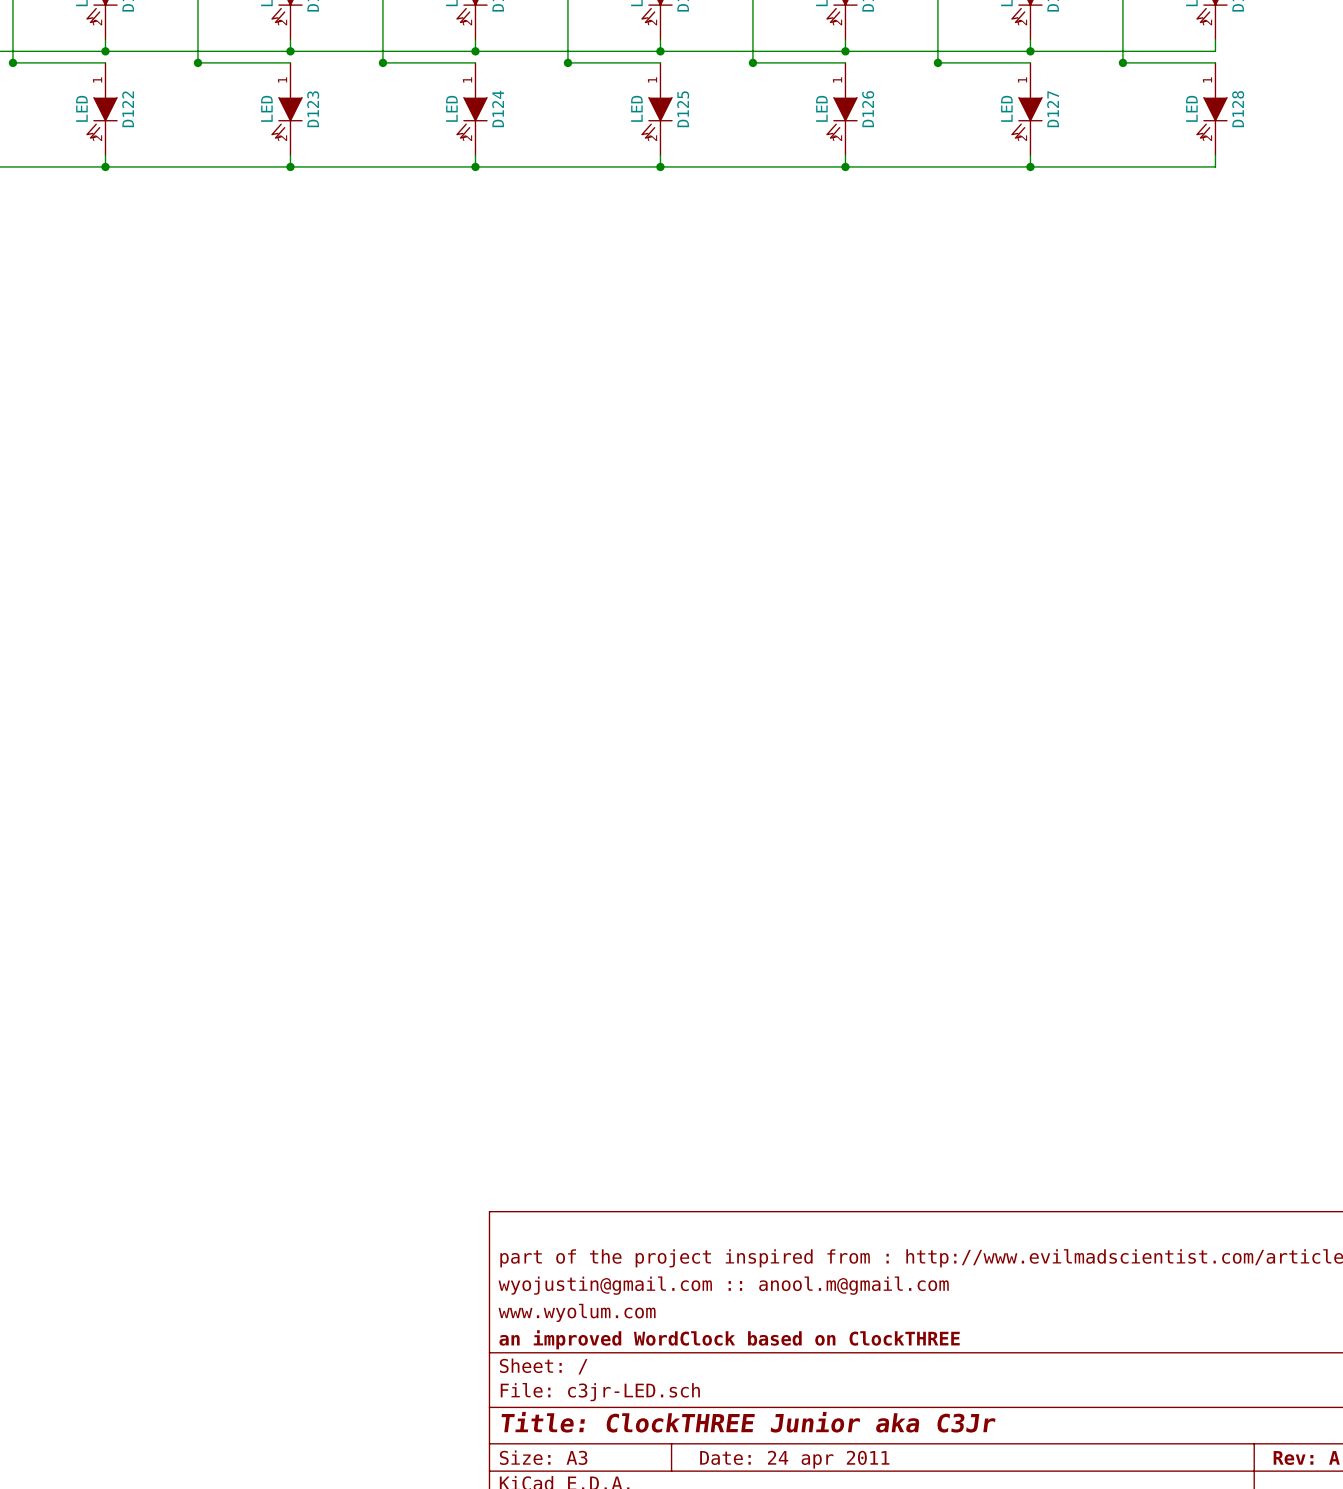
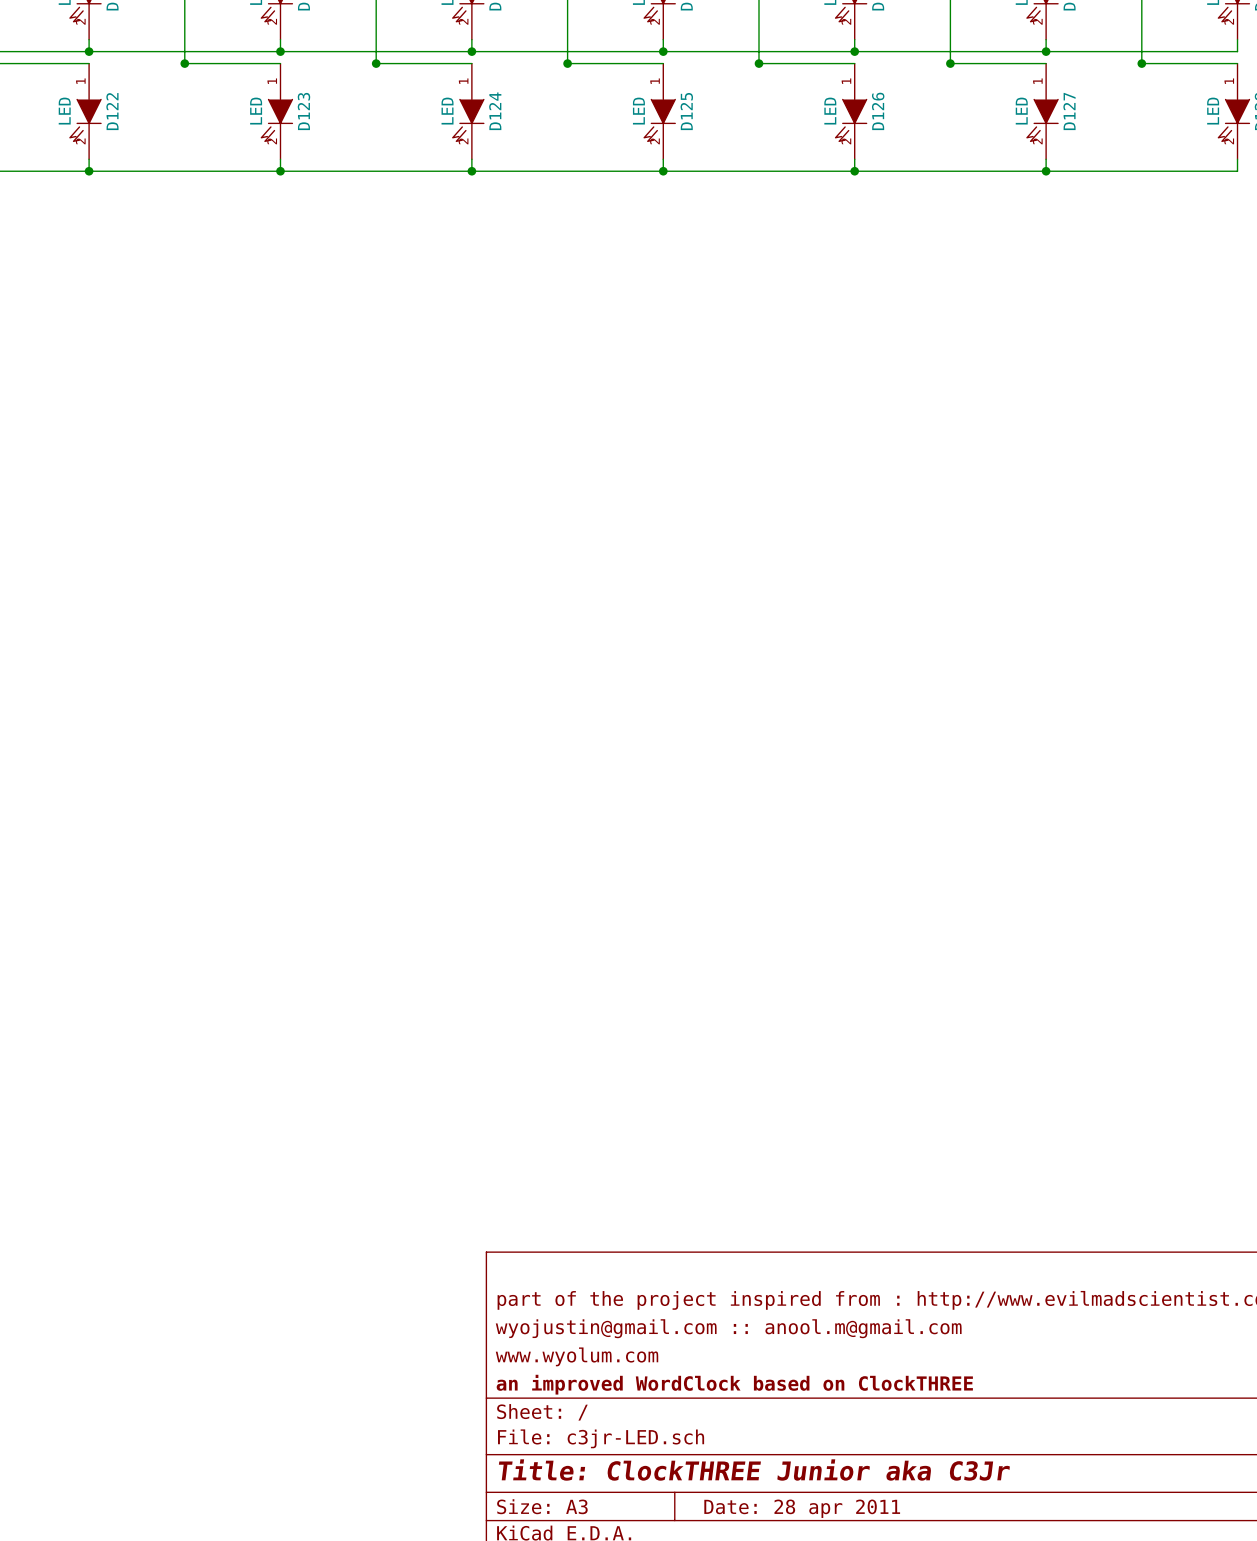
title block: Date: 24 apr 2011 (794, 1459) -> Date: 28 apr 2011 (802, 1508)

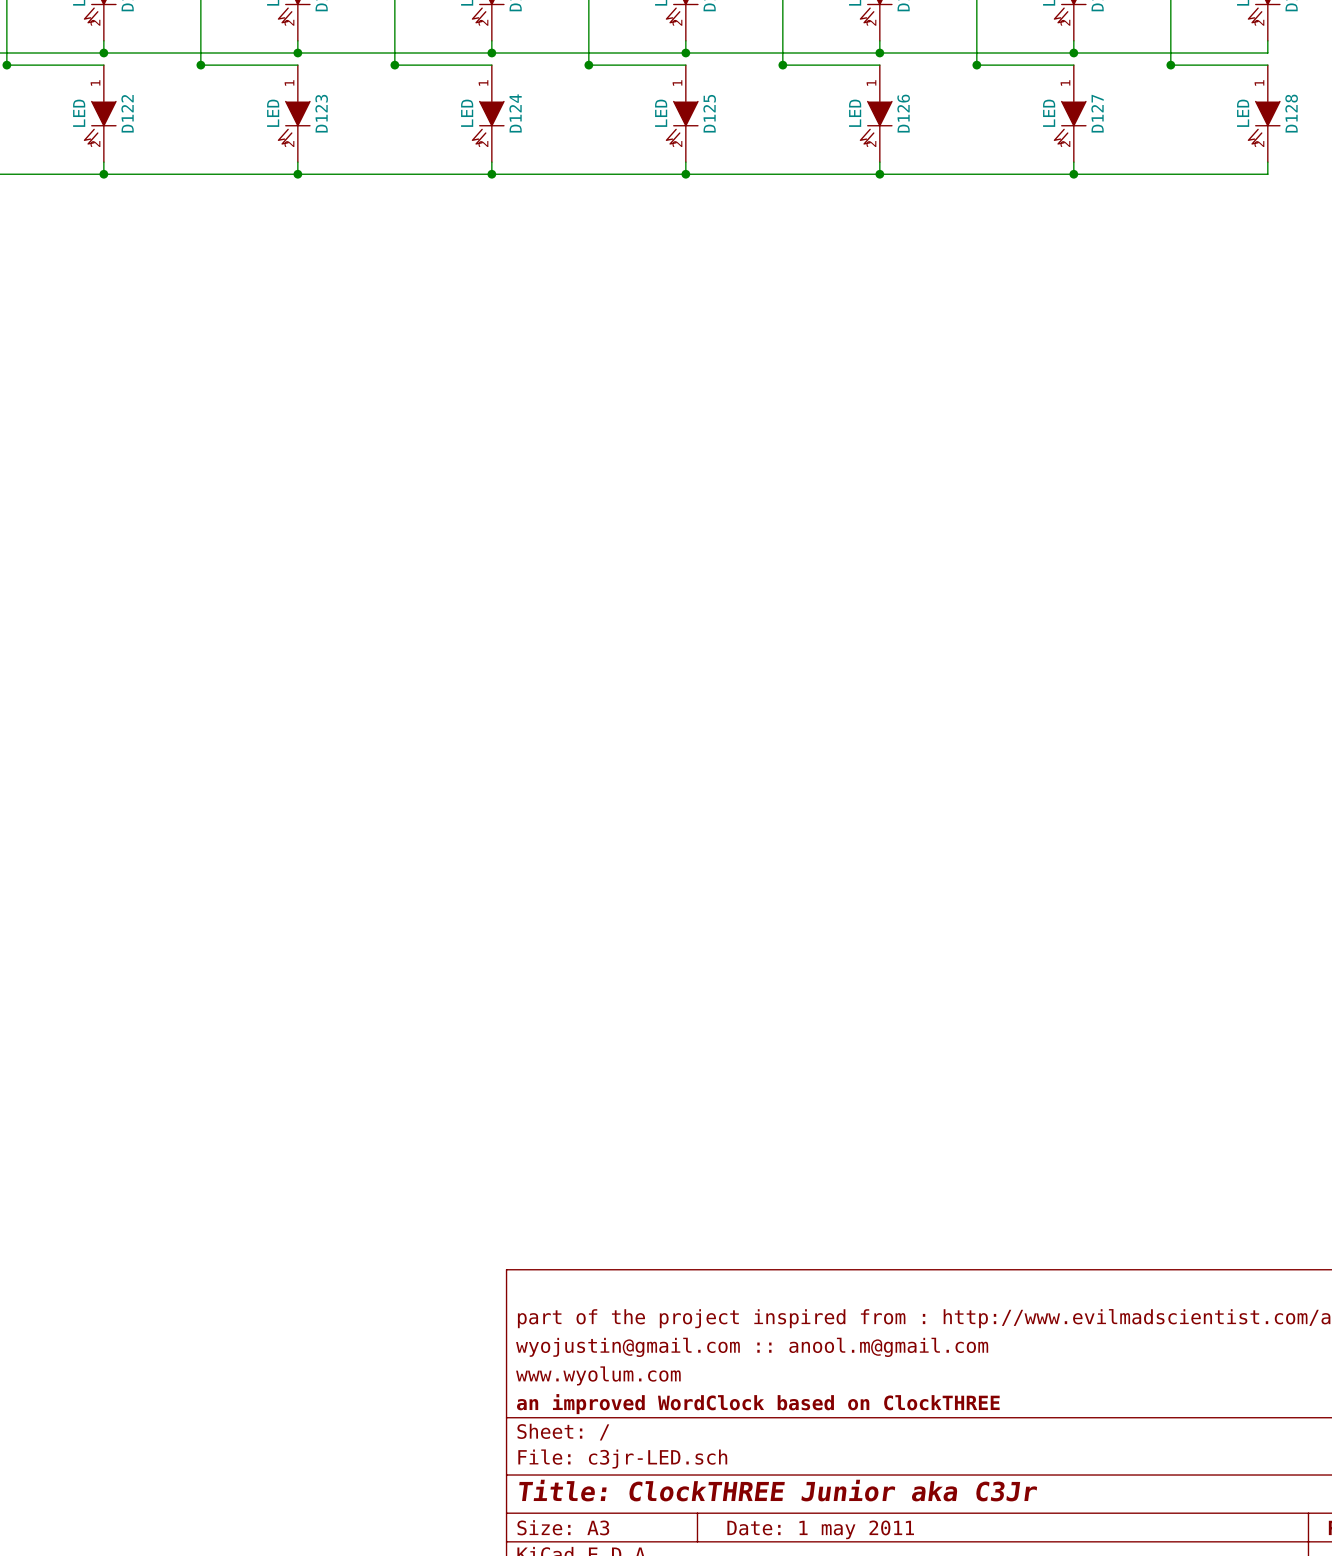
title block: Date: 28 apr 2011 (802, 1508) -> Date: 1 may 2011 (820, 1529)

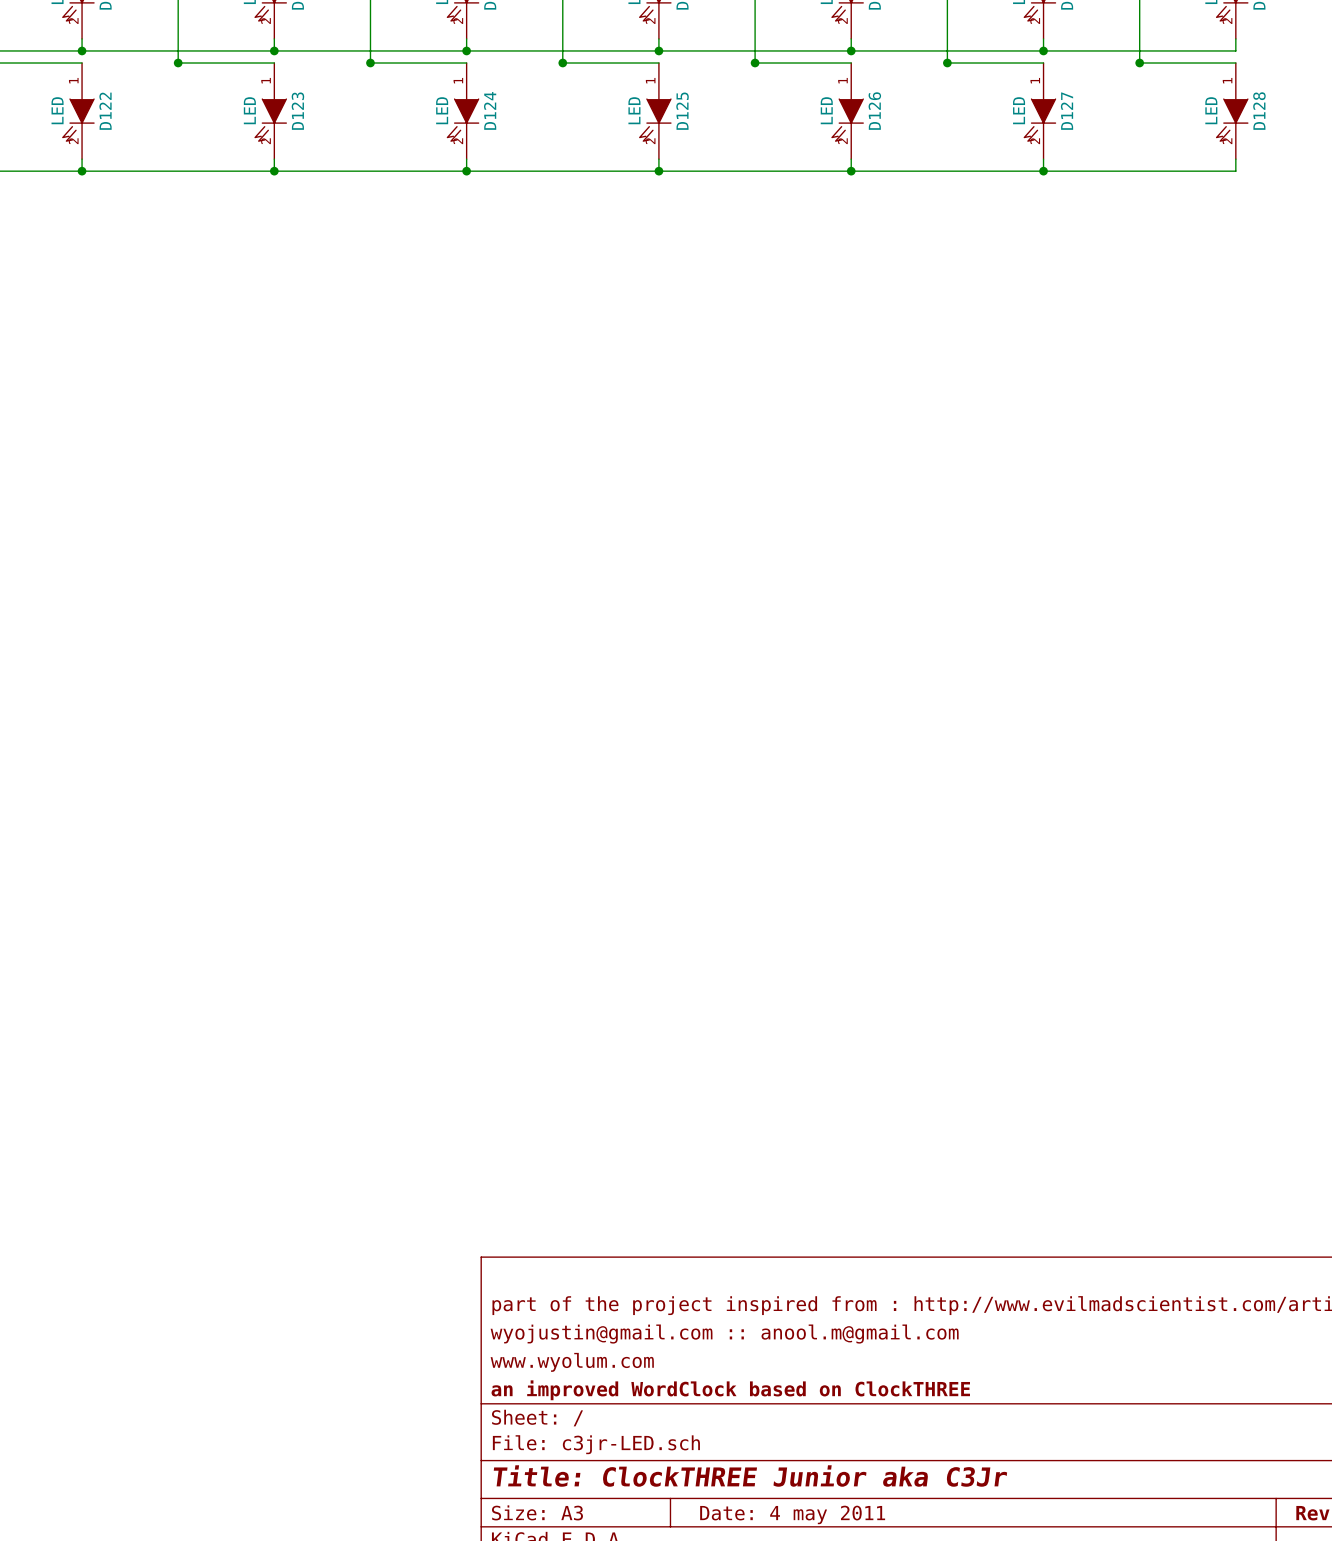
title block: Date: 1 may 2011 (820, 1529) -> Date: 4 may 2011 (792, 1514)

